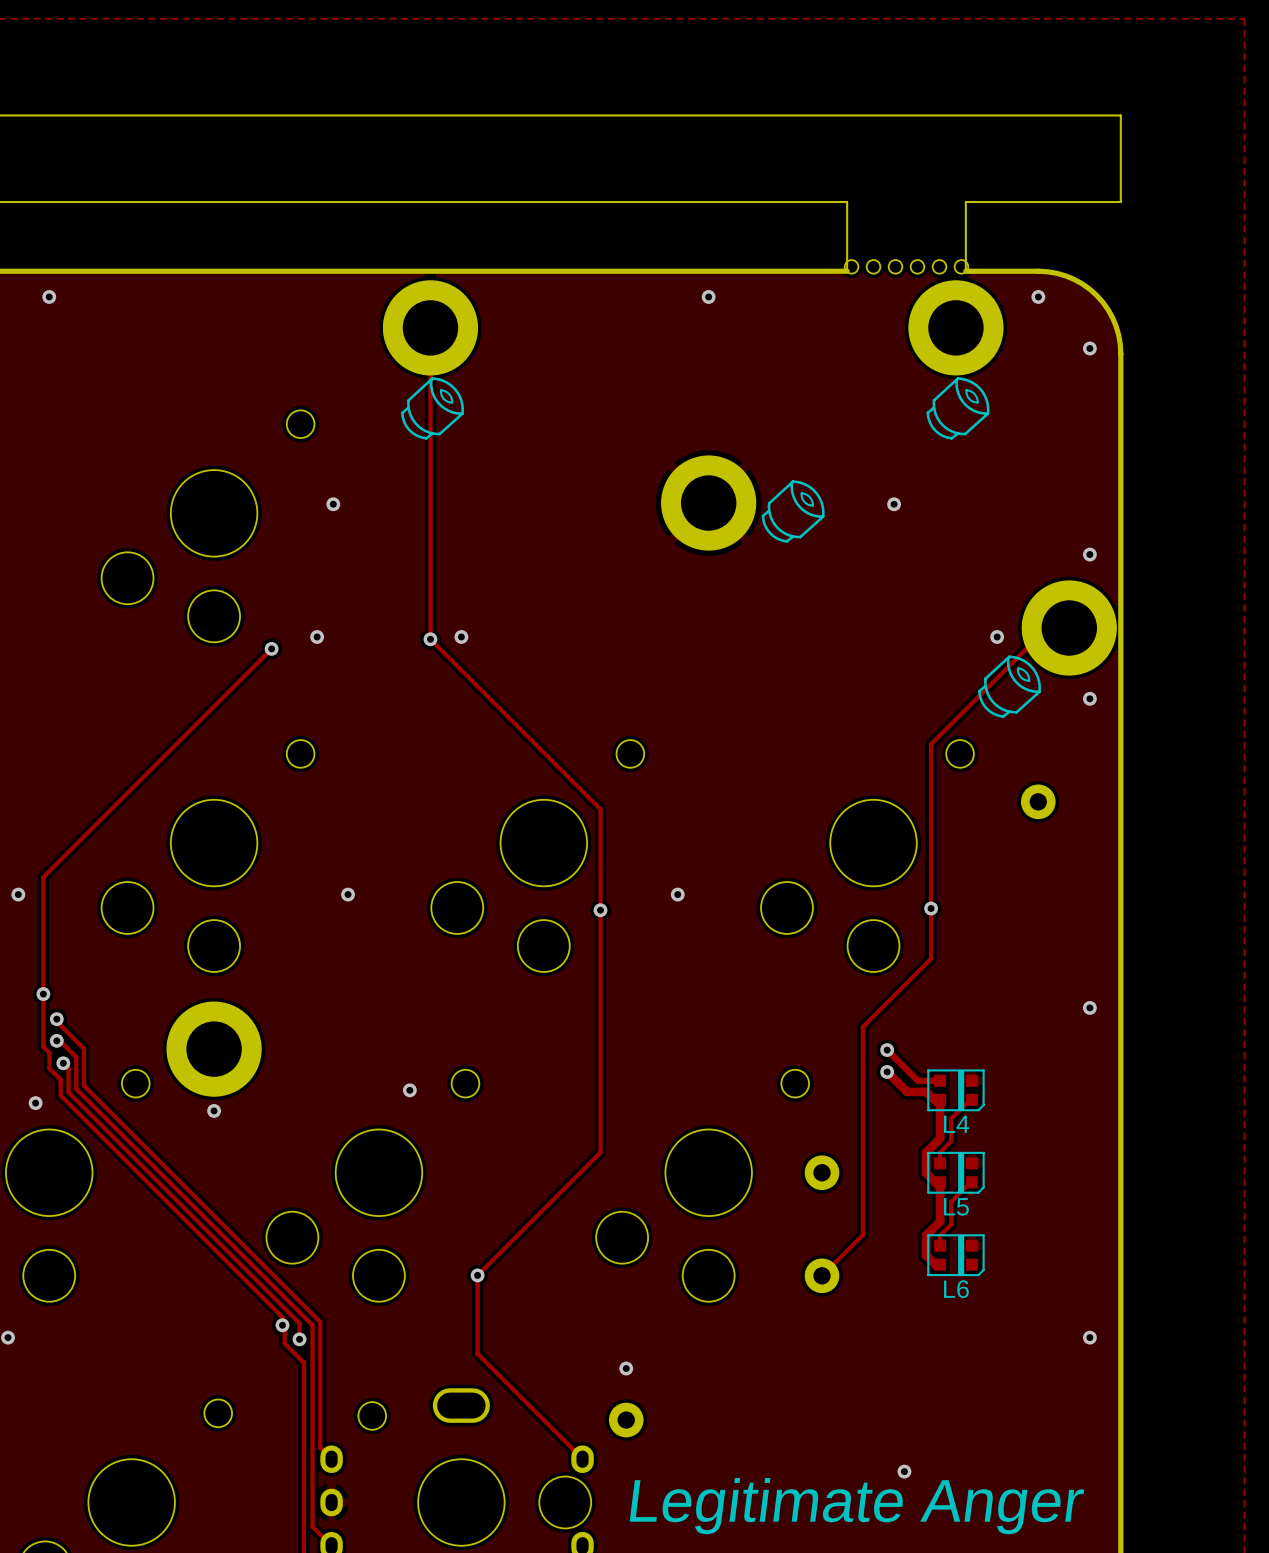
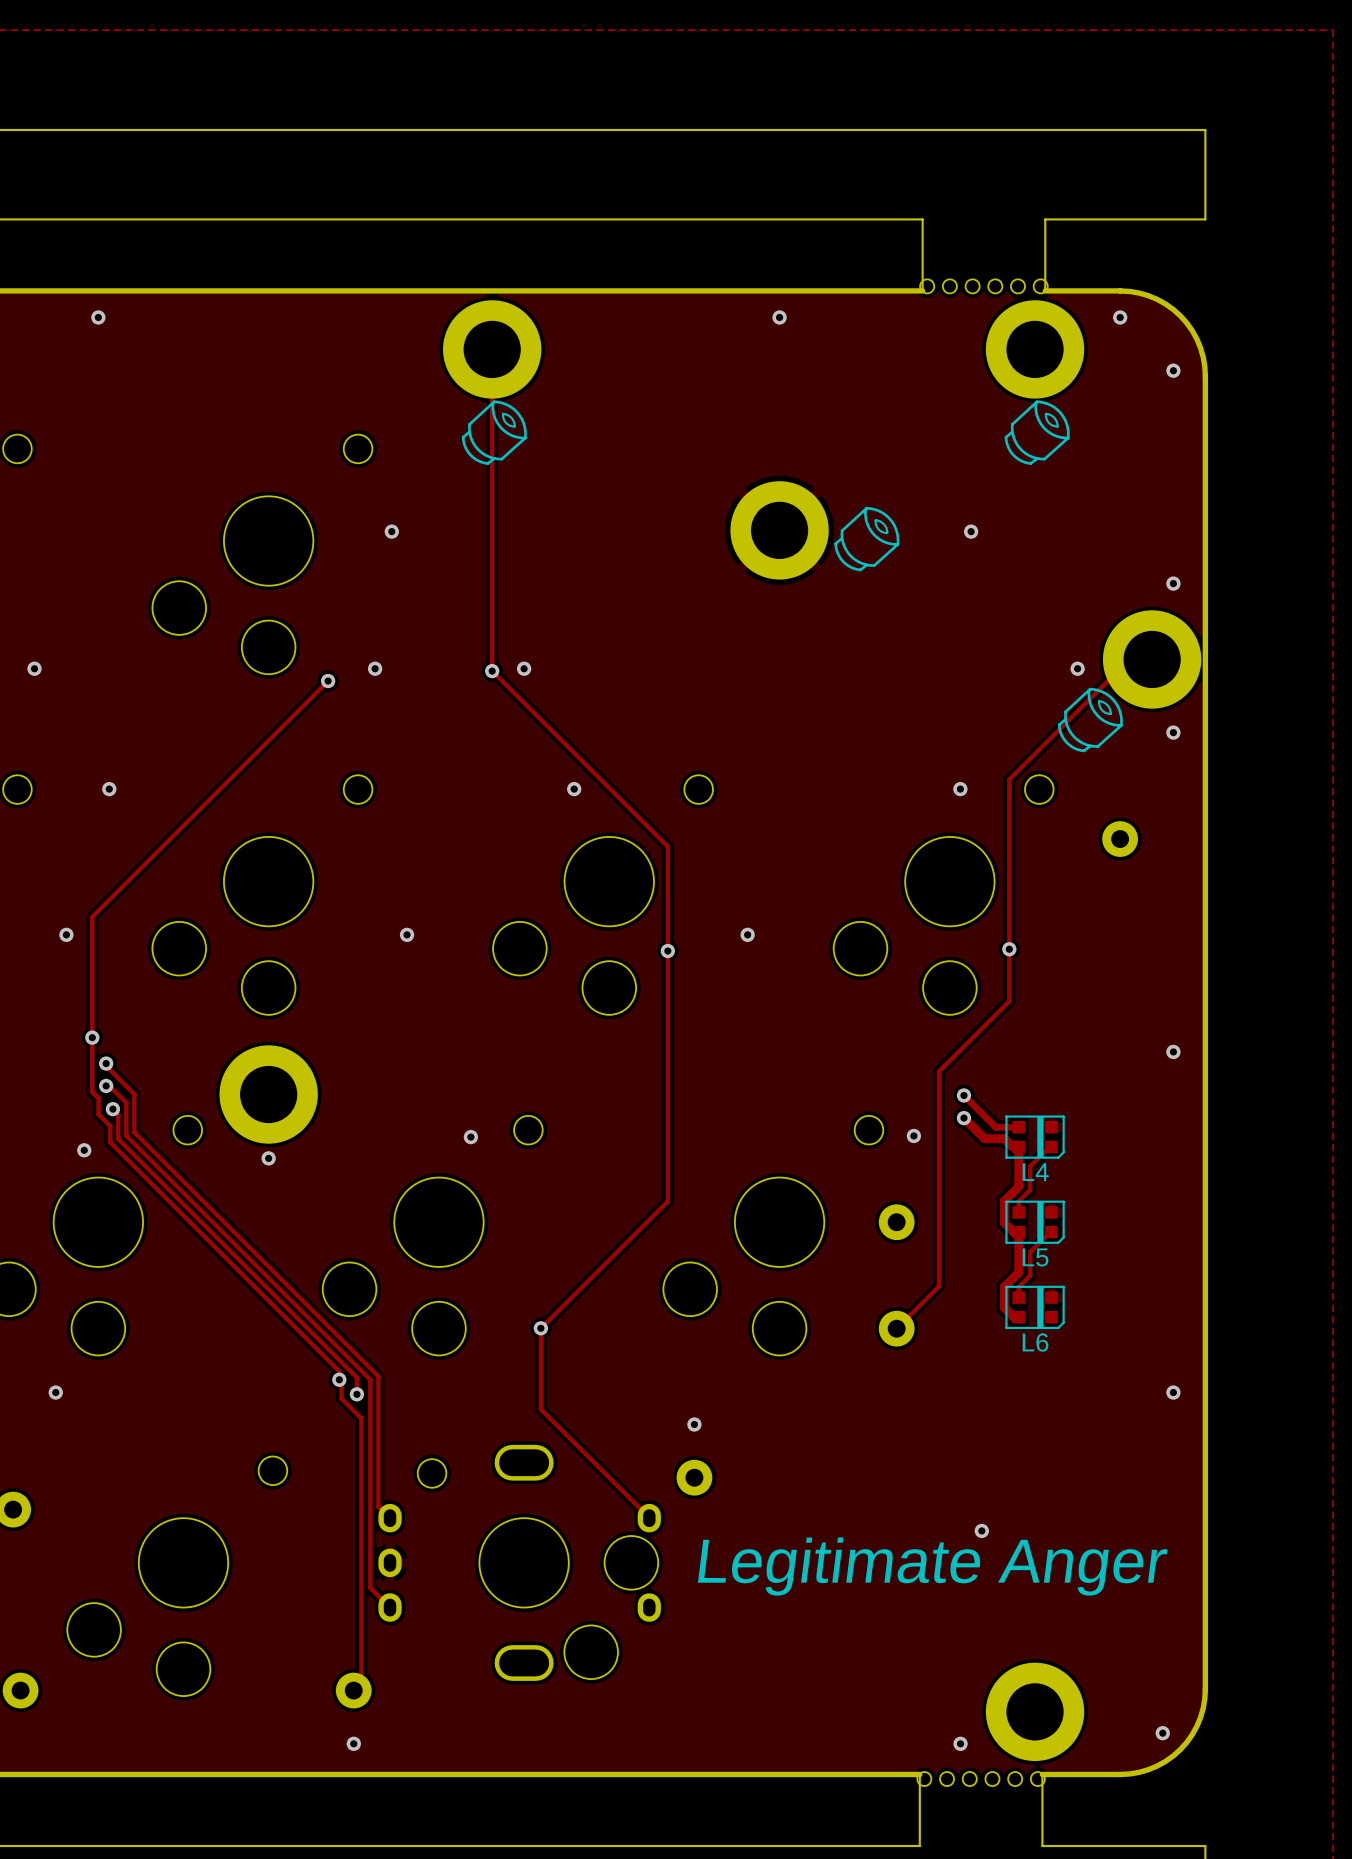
via: none -> (109, 789)
via: none -> (574, 789)
via: none -> (960, 789)
via: none -> (913, 1135)

